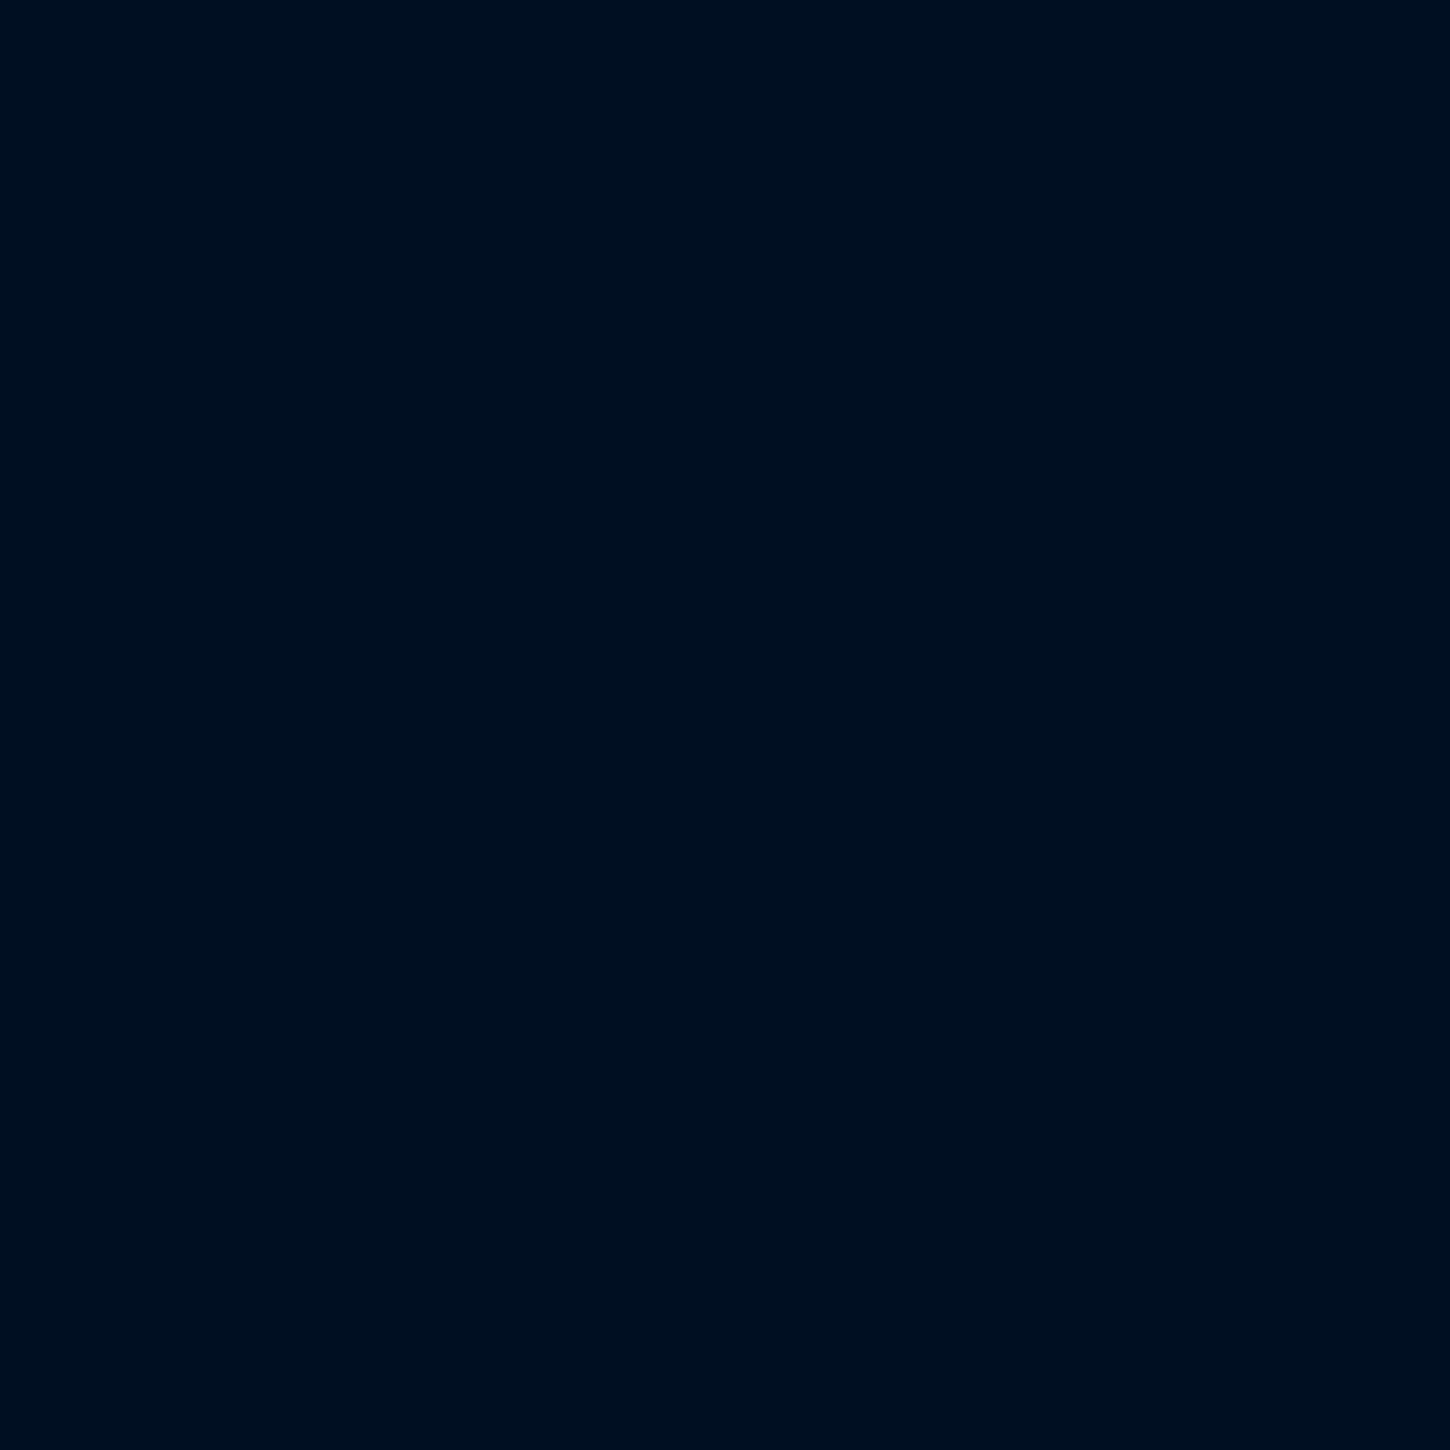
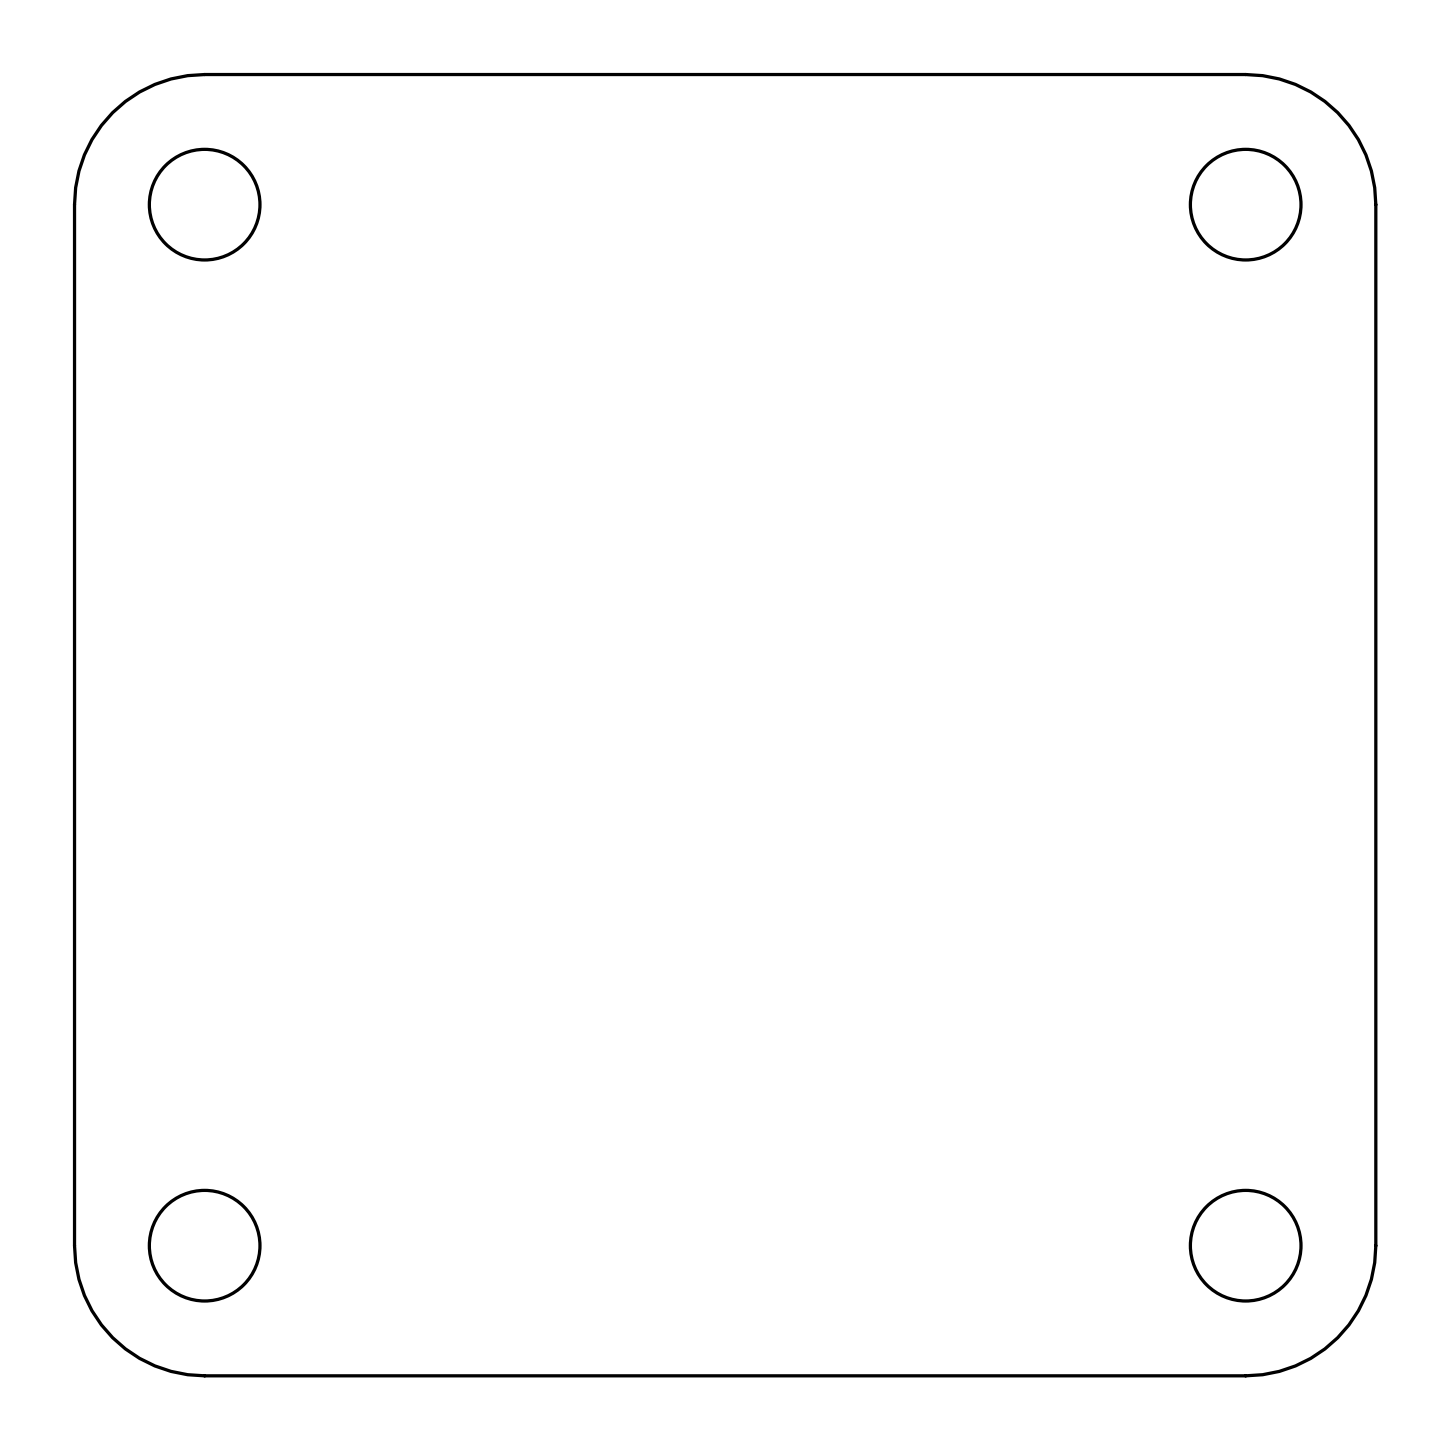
board edge: none -> (1245, 74) (204, 74) (170, 78) (154, 84) (125, 101) (112, 112) (101, 125) (84, 154) (78, 170) (74, 204) (74, 1245) (75, 1262) (84, 1295) (101, 1324) (112, 1337) (125, 1348) (154, 1365) (170, 1371) (204, 1375) (1245, 1375) (1262, 1374) (1295, 1365) (1324, 1348) (1337, 1337) (1358, 1310) (1365, 1295) (1374, 1262) (1375, 1245) (1374, 187) (1365, 154) (1358, 139) (1337, 112) (1324, 101) (1295, 84) (1279, 78) (1245, 74)
round board edge: none -> [147, 147, 262, 262]
round board edge: none -> [1188, 147, 1303, 262]
round board edge: none -> [147, 1188, 262, 1303]
round board edge: none -> [1188, 1188, 1303, 1303]

